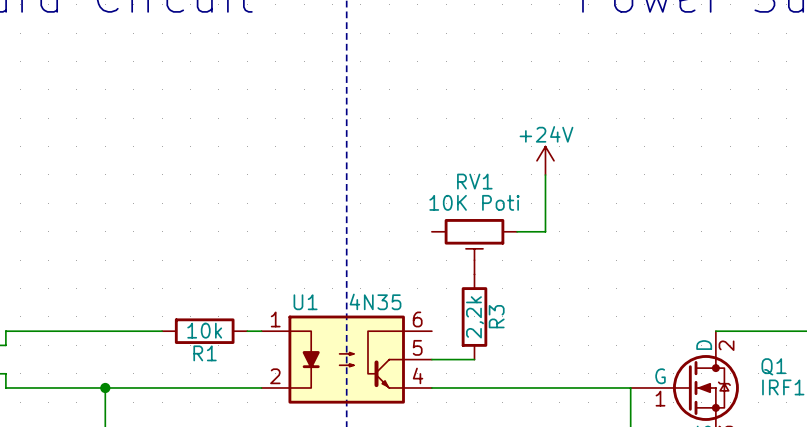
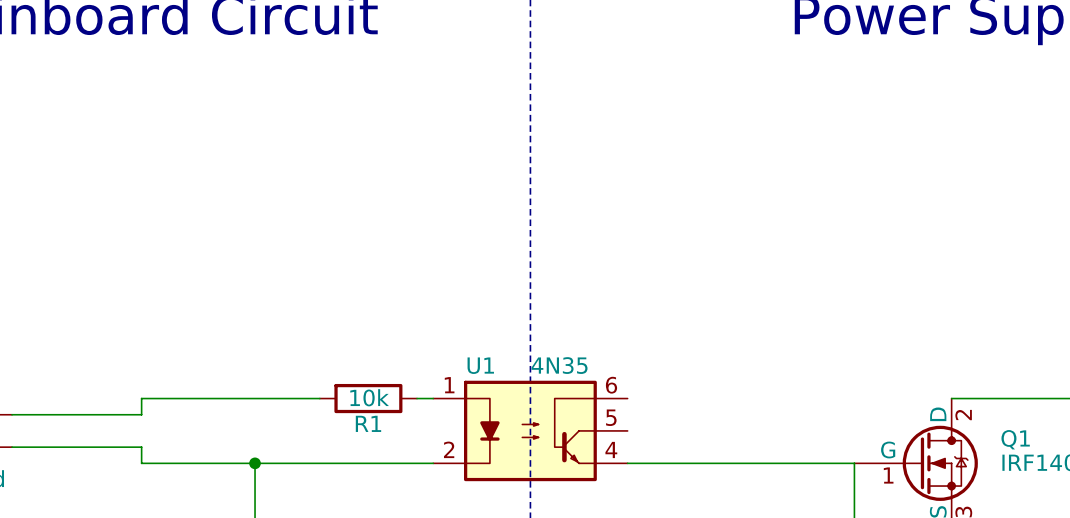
power symbol: +24V (545, 160) -> none
wire: (545, 174) (545, 231) (517, 231) -> none
RV1: 10K Poti (474, 246) -> none
R3: 2,2k (474, 316) -> none
wire: (431, 359) (474, 359) -> none

